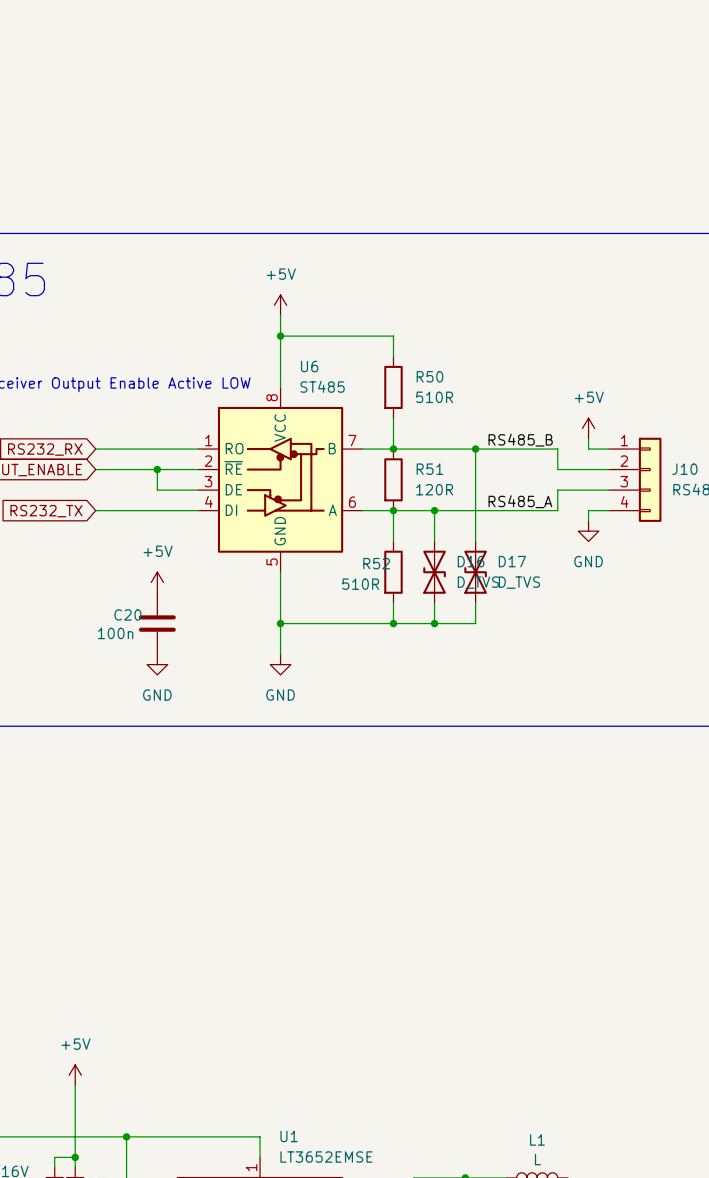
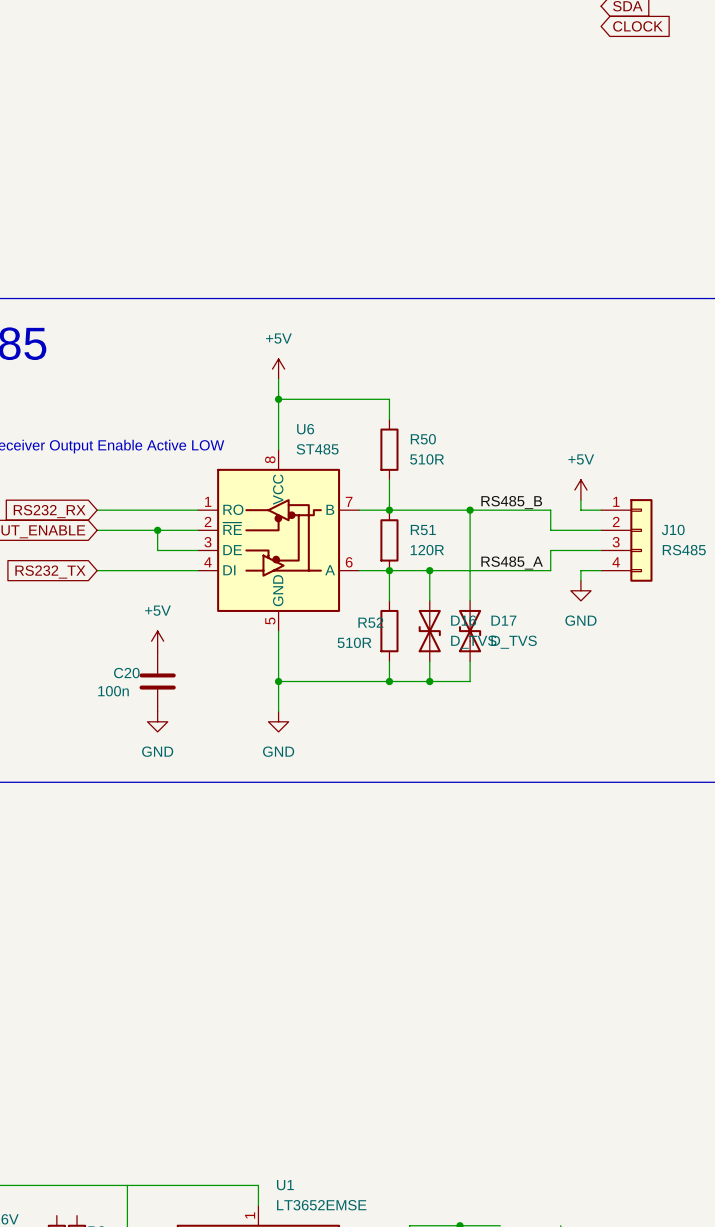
power symbol: +5V (75, 1075) -> none
wire: (75, 1085) (75, 1167) -> none
junction: (126, 1136) -> none
wire: (75, 1157) (54, 1157) (54, 1167) -> none
junction: (75, 1157) -> none
L1: L (537, 1175) -> none

